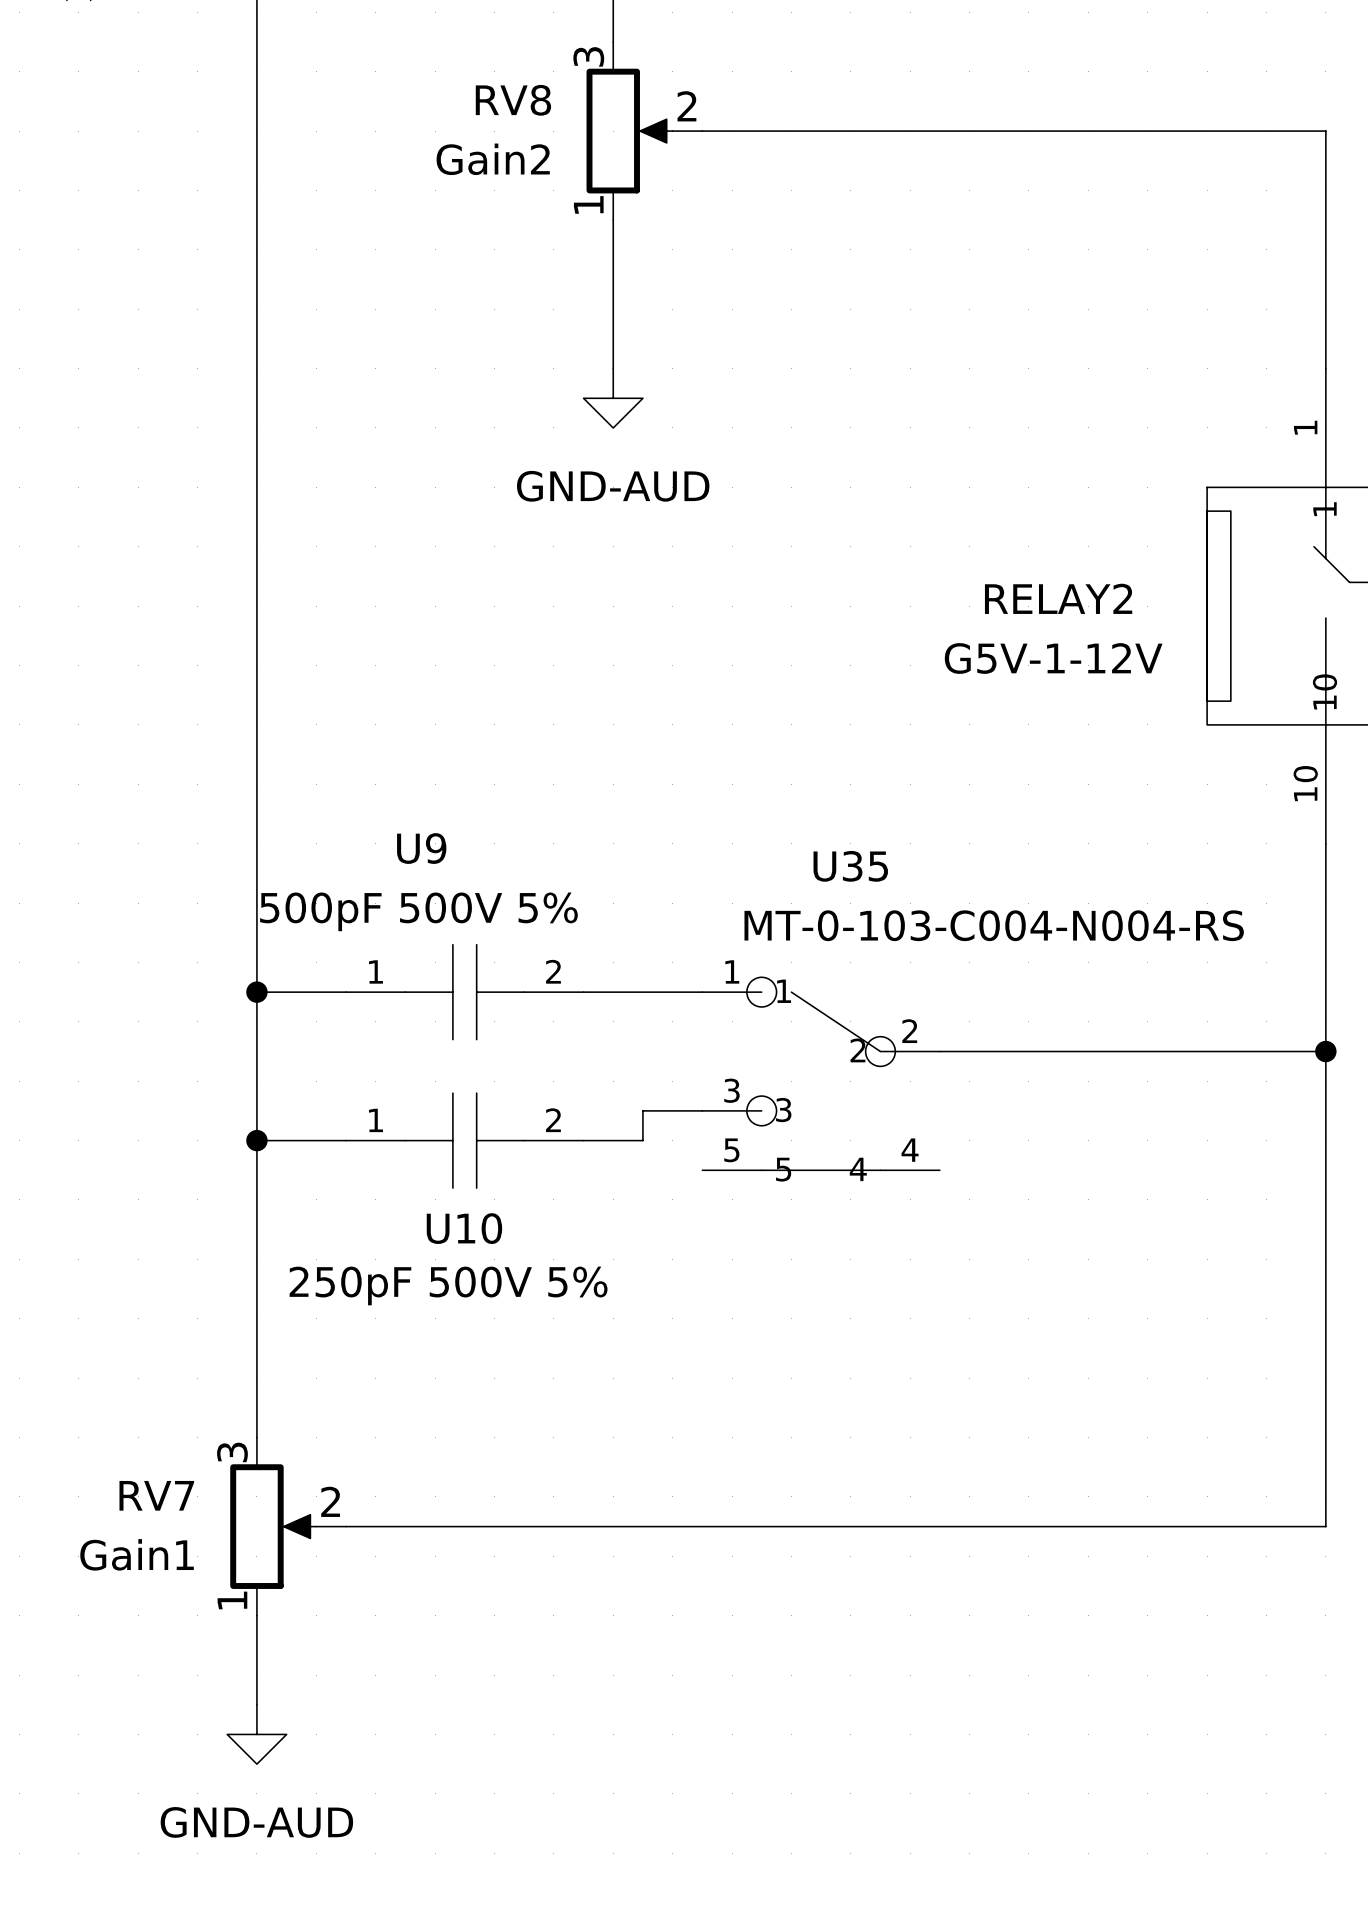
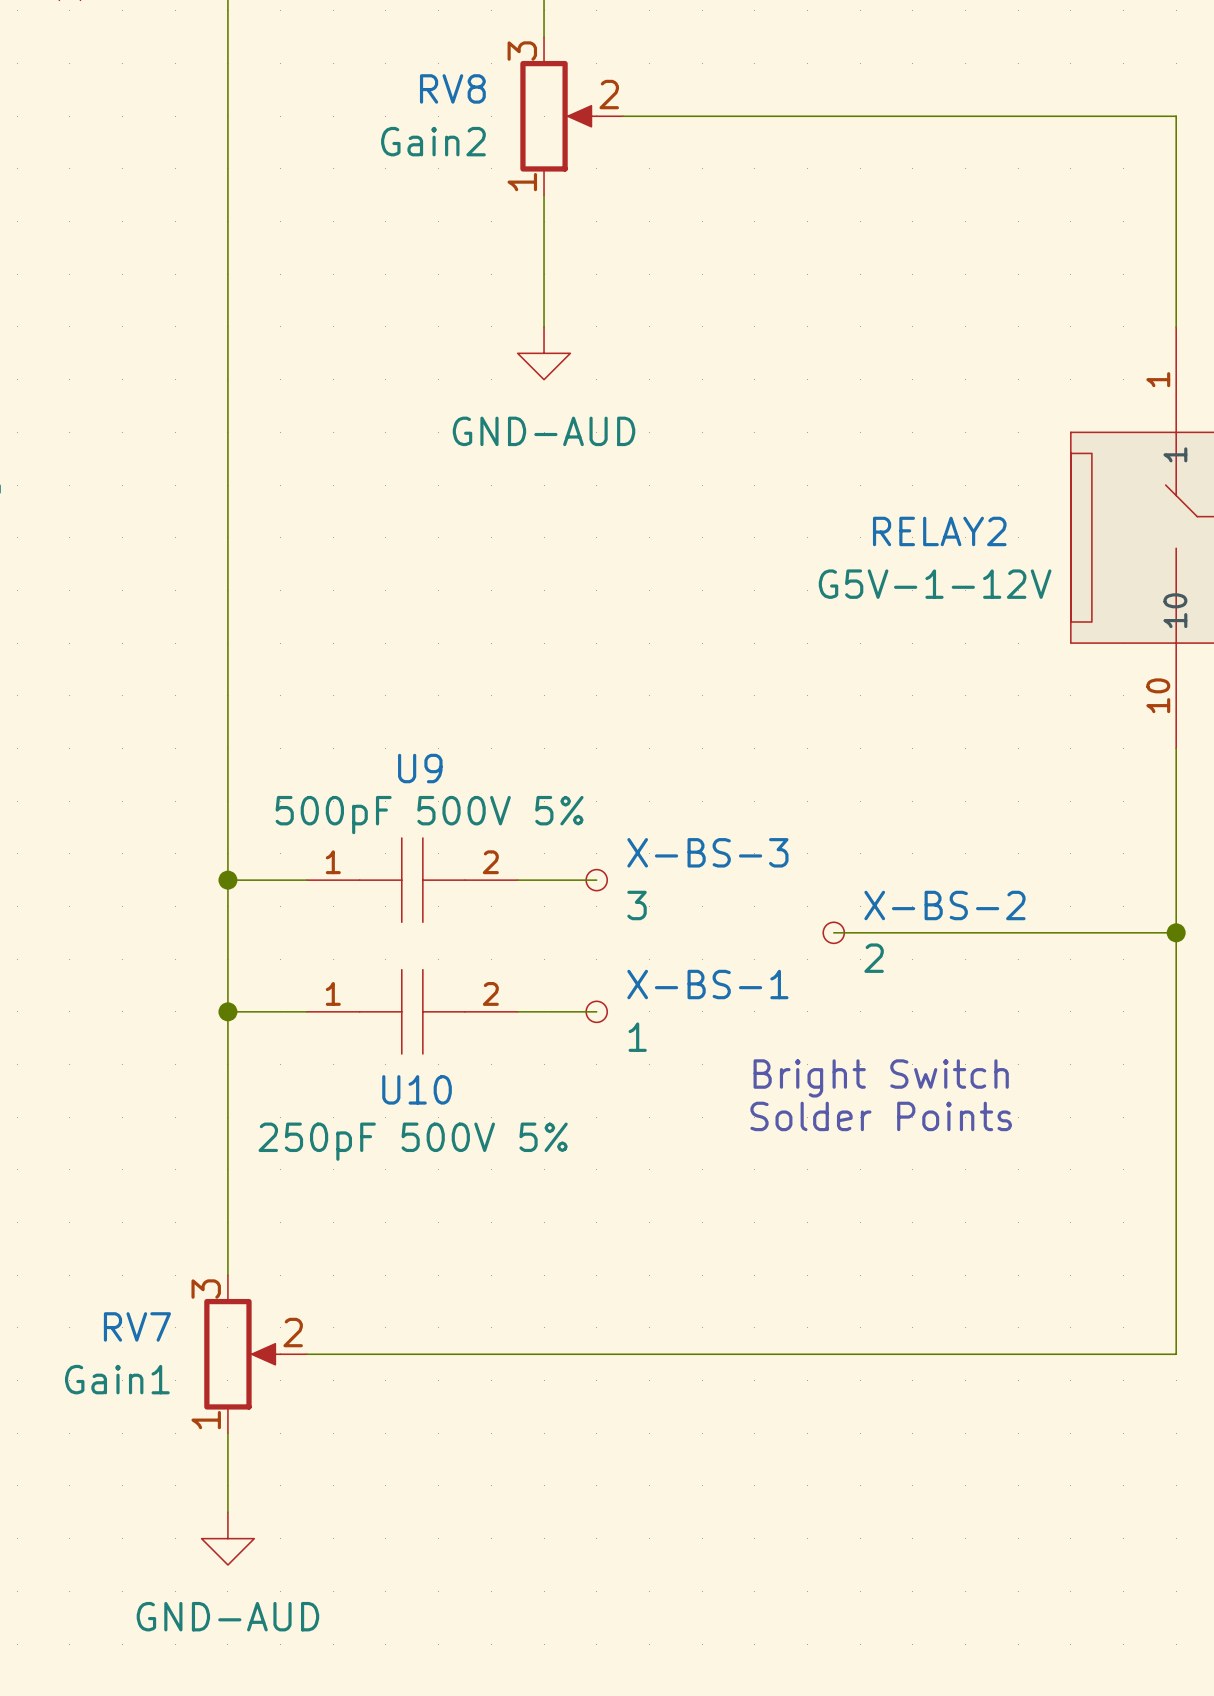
U9 name position: U9 (421, 848) -> U9 (420, 768)
U9 value position: 500pF 500V 5% (418, 911) -> 500pF 500V 5% (429, 815)
wire: (672, 992) (702, 992) -> none
X-BS-3: none -> 3 (596, 880)
X-BS-2: none -> 2 (833, 932)
U35: MT-0-103-C004-N004-RS (821, 1073) -> none
wire: (702, 1110) (642, 1110) (642, 1140) -> (596, 1011) (570, 1011)
X-BS-1: none -> 1 (596, 1011)
text: none -> Bright Switch (881, 1078)
text: none -> Solder Points (881, 1116)

